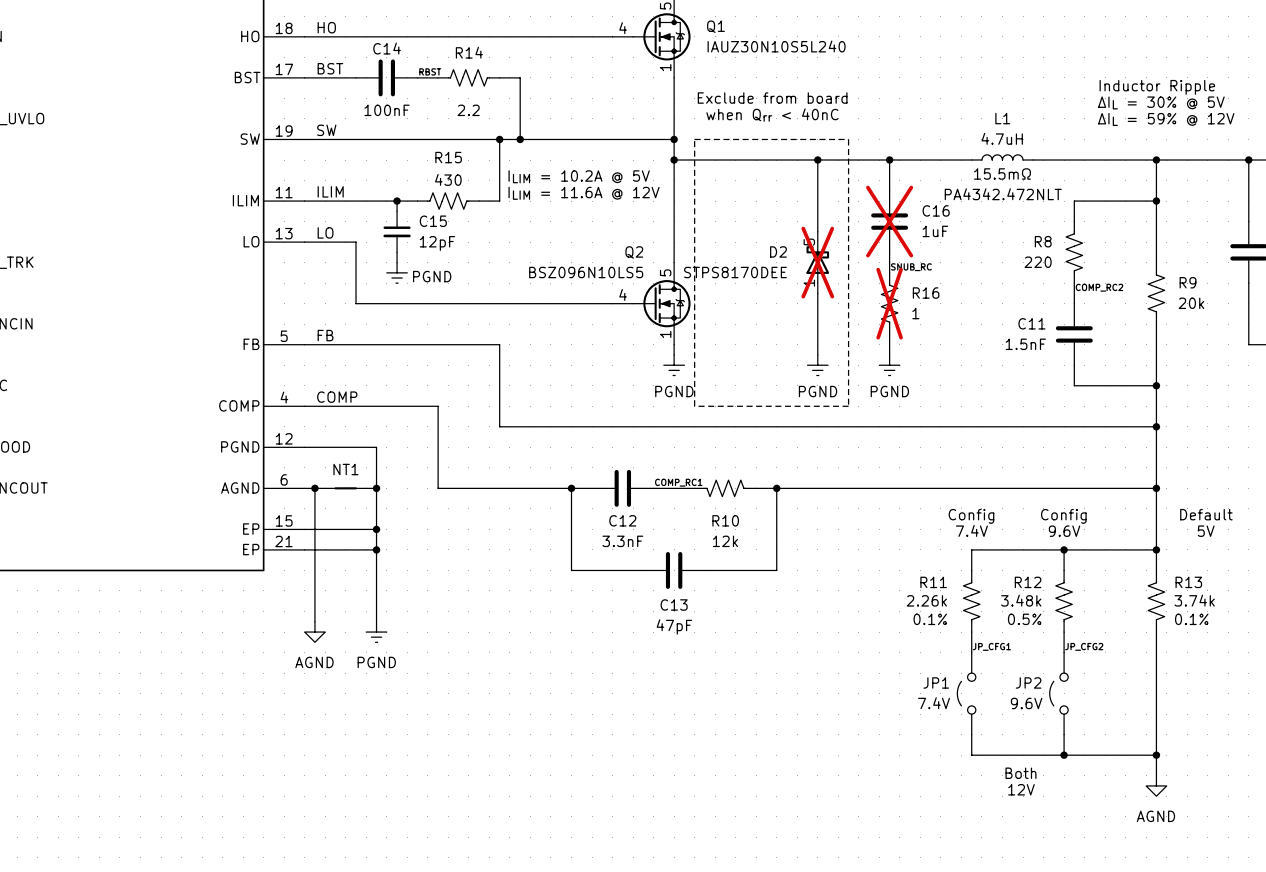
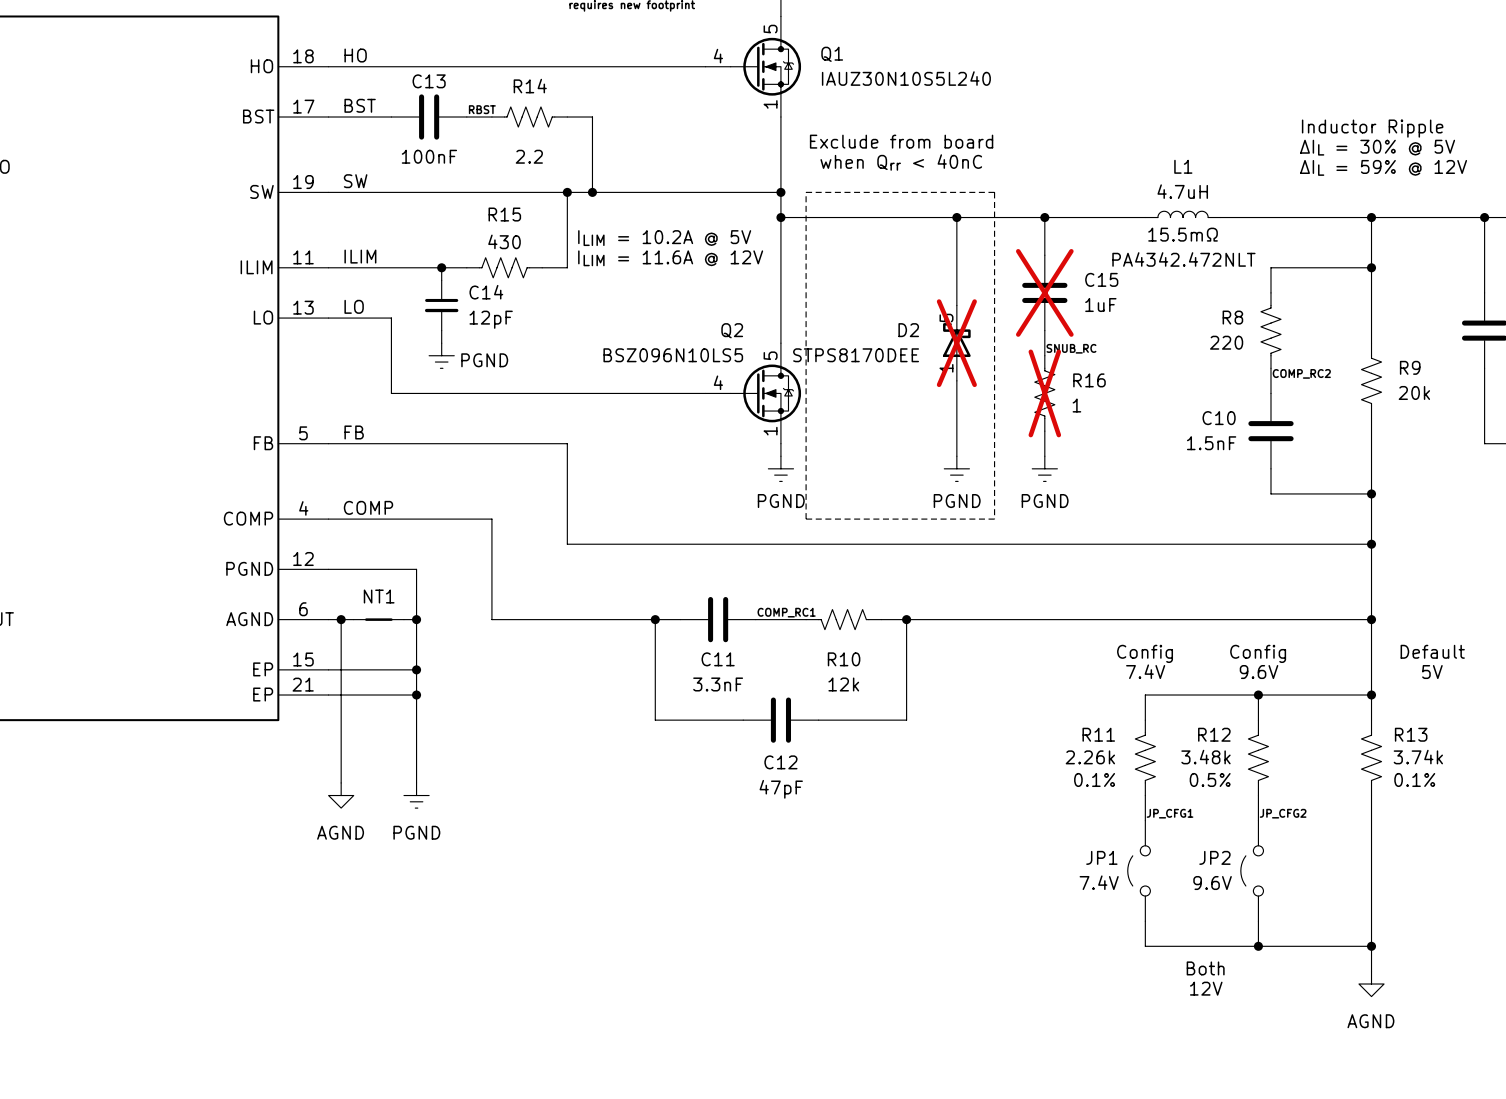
C14 name: C14 (387, 48) -> C13 (429, 81)
C16 name: C16 (936, 210) -> C15 (1101, 279)
C15 name: C15 (433, 221) -> C14 (486, 292)
C11 name: C11 (1031, 323) -> C10 (1219, 418)
C12 name: C12 (622, 520) -> C11 (718, 659)
C13 name: C13 (674, 604) -> C12 (780, 762)

